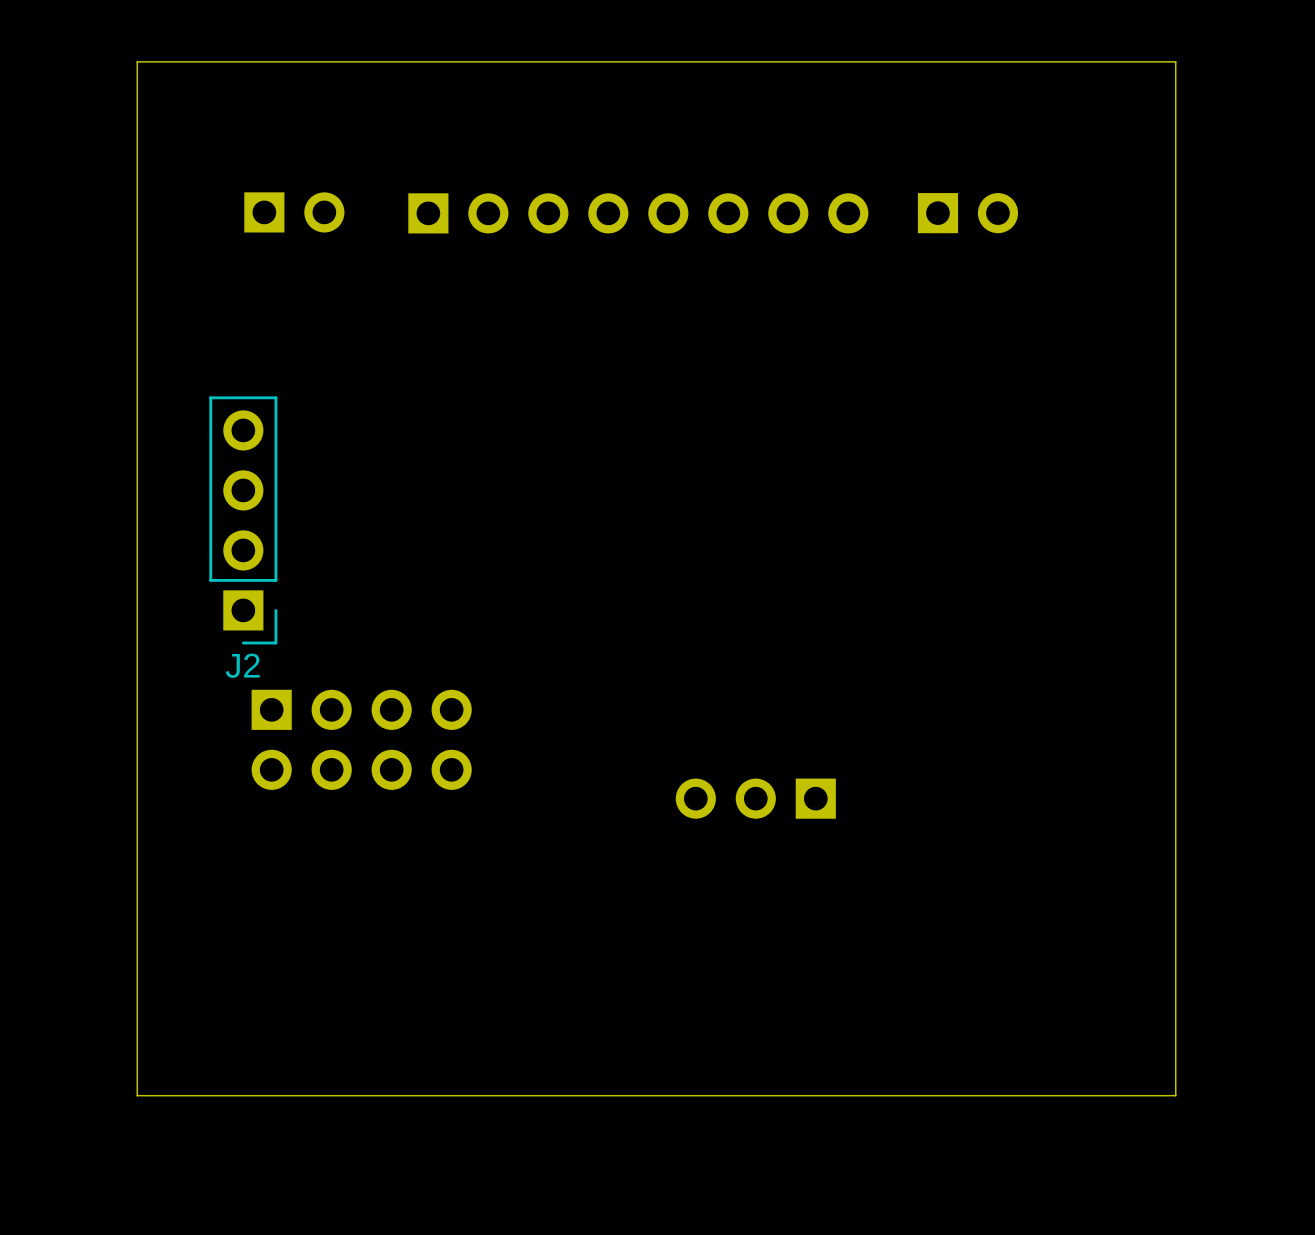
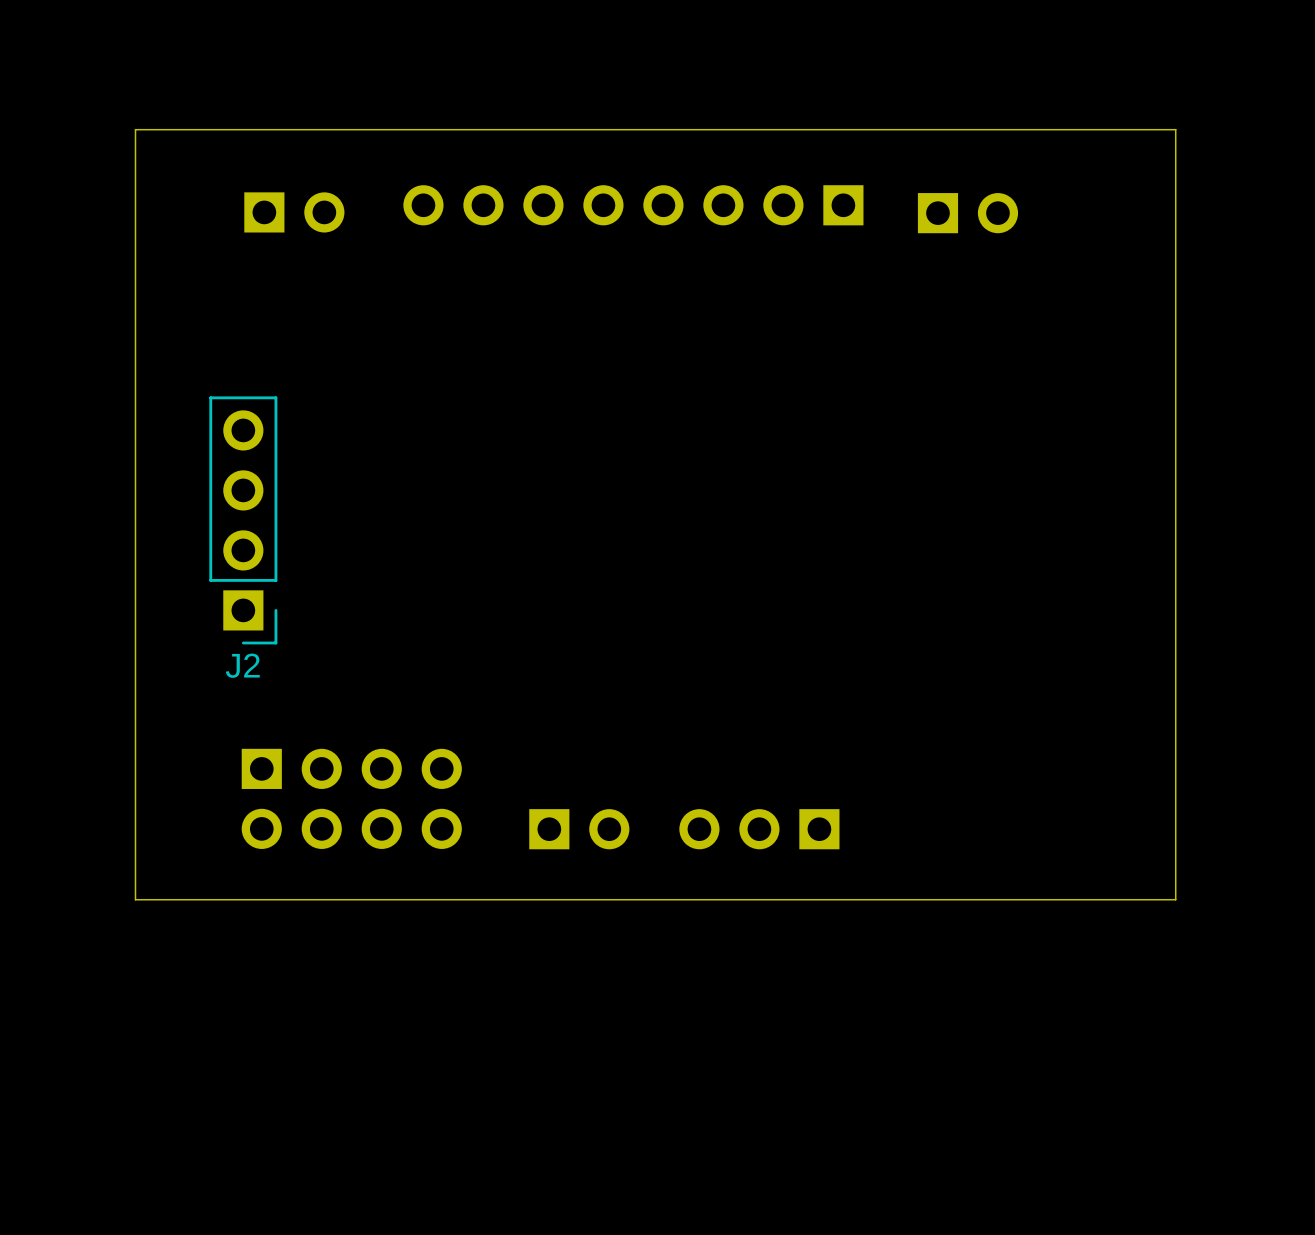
board edge: (1175, 129) (1175, 61) (137, 61) (137, 1095) (1175, 1095) (1175, 899) -> (1175, 129) (135, 129) (135, 899) (1175, 899)
part rotation: 0° (638, 213) -> 180° (633, 205)
part position: (361, 739) -> (351, 798)
part position: (755, 798) -> (759, 829)
part: none -> (579, 829)

